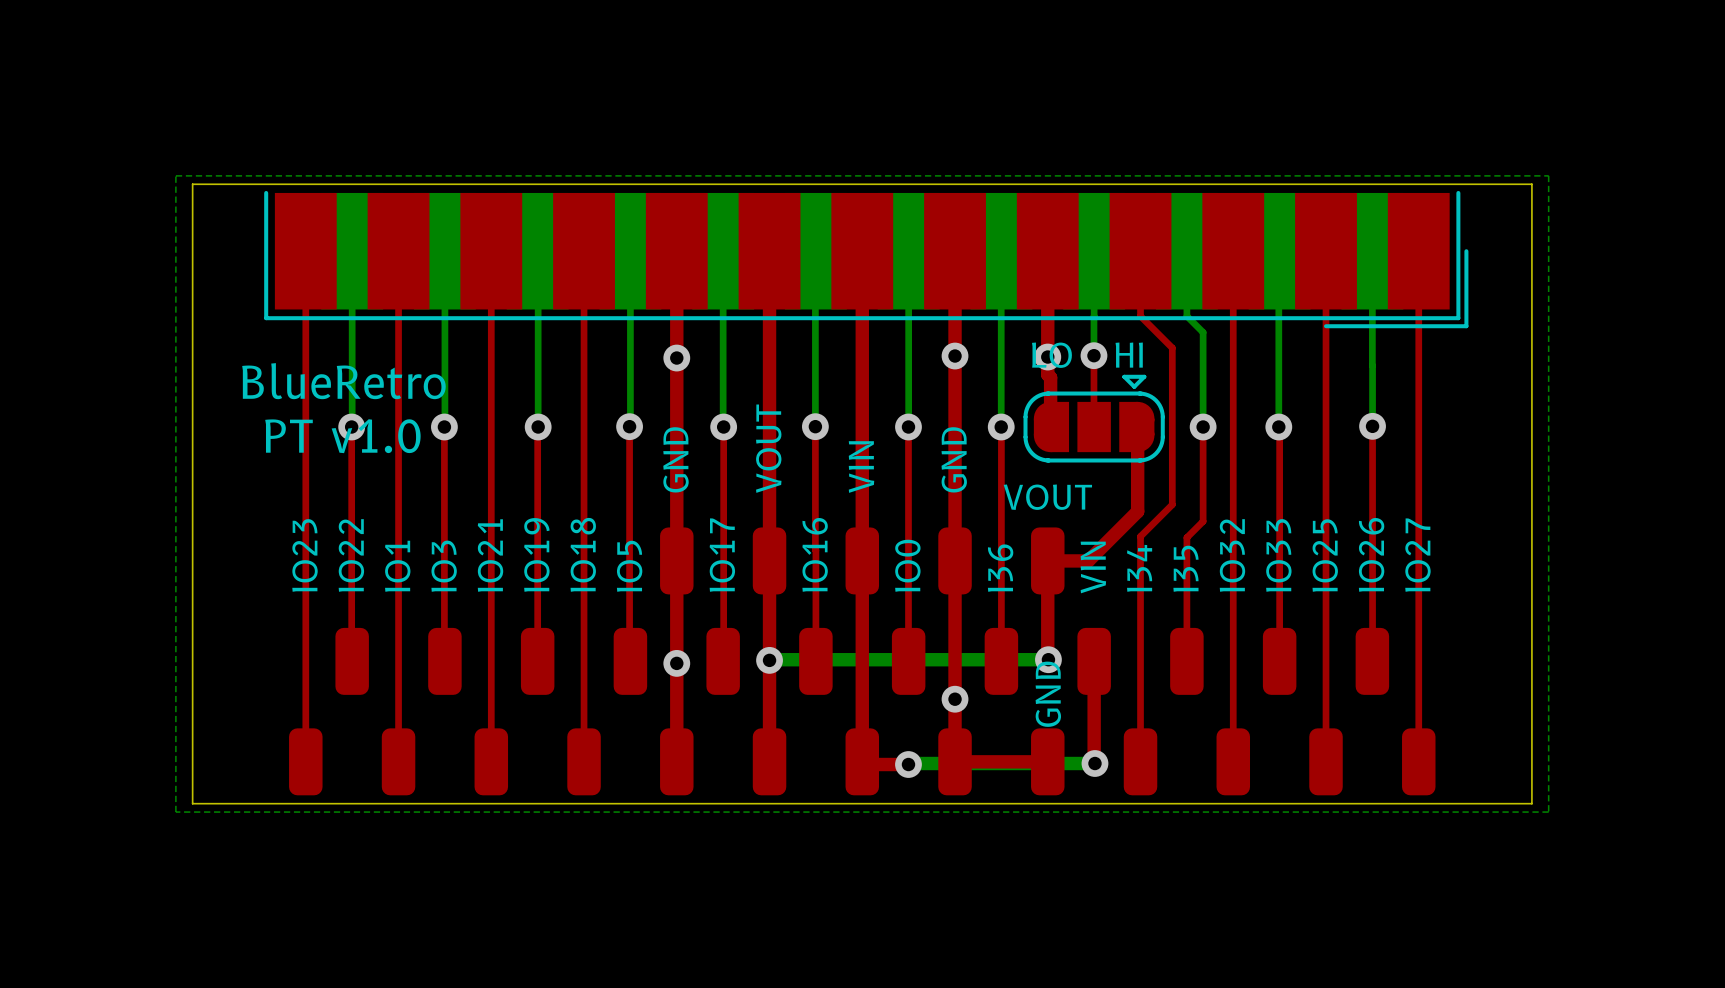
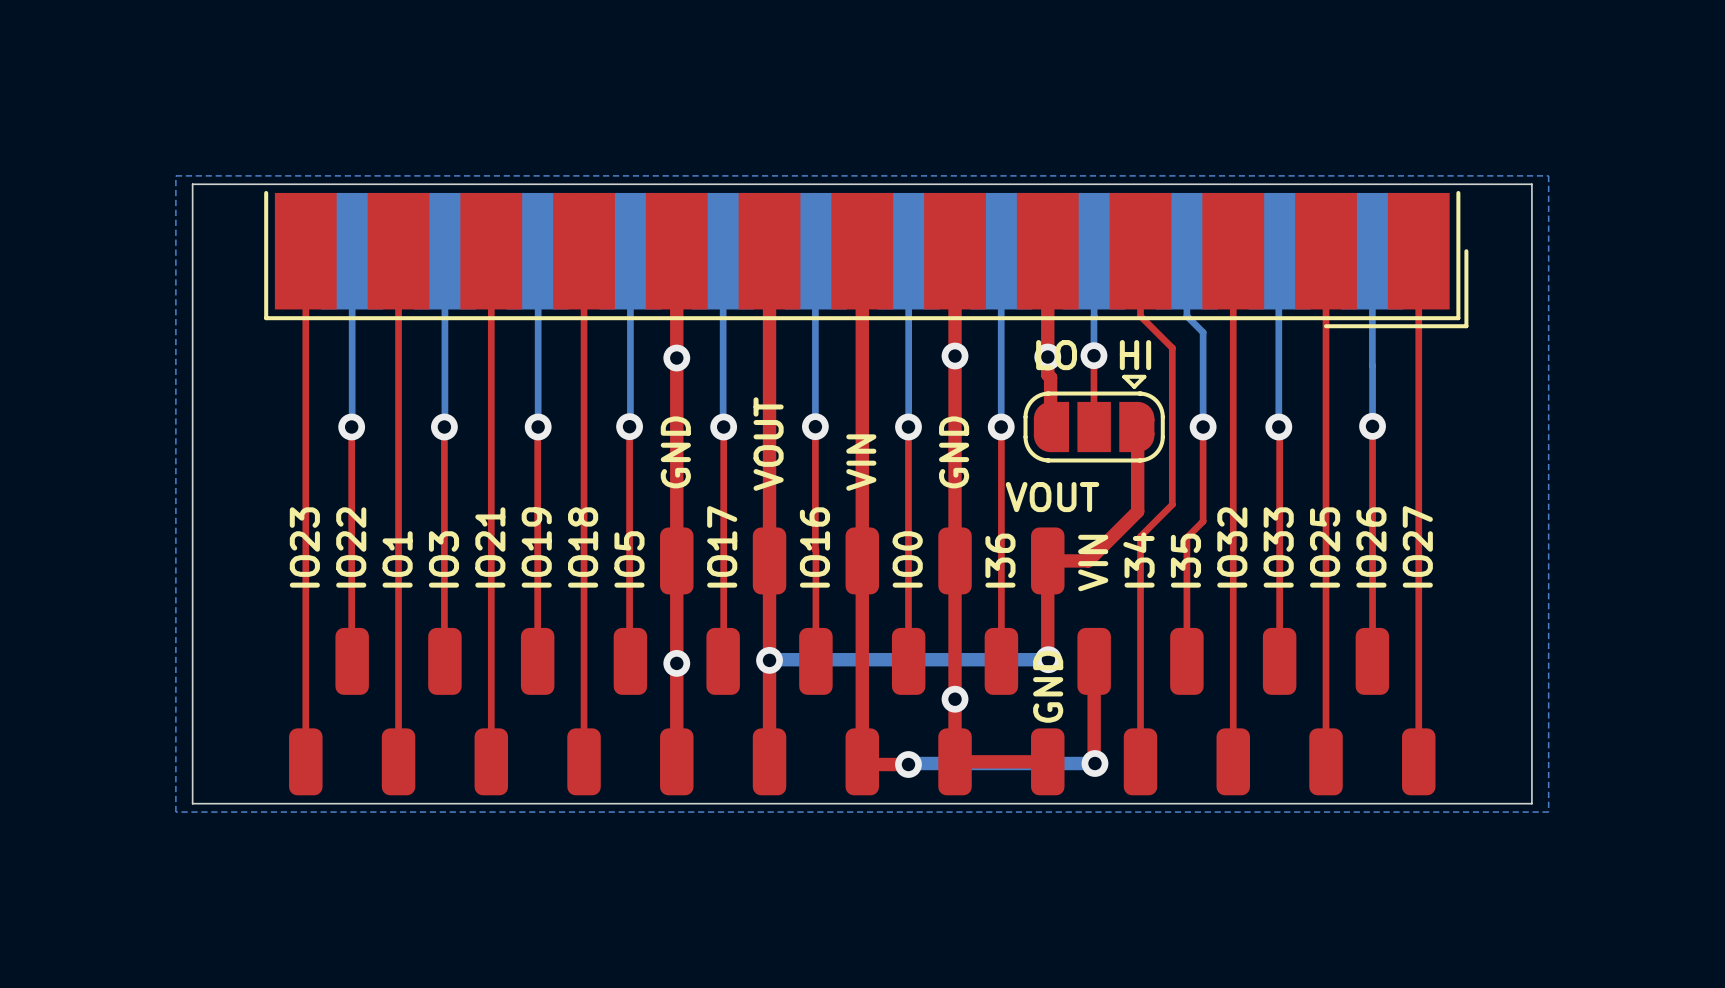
text: BlueRetro (343, 381) -> none
text: PT v1.0 (342, 436) -> none

